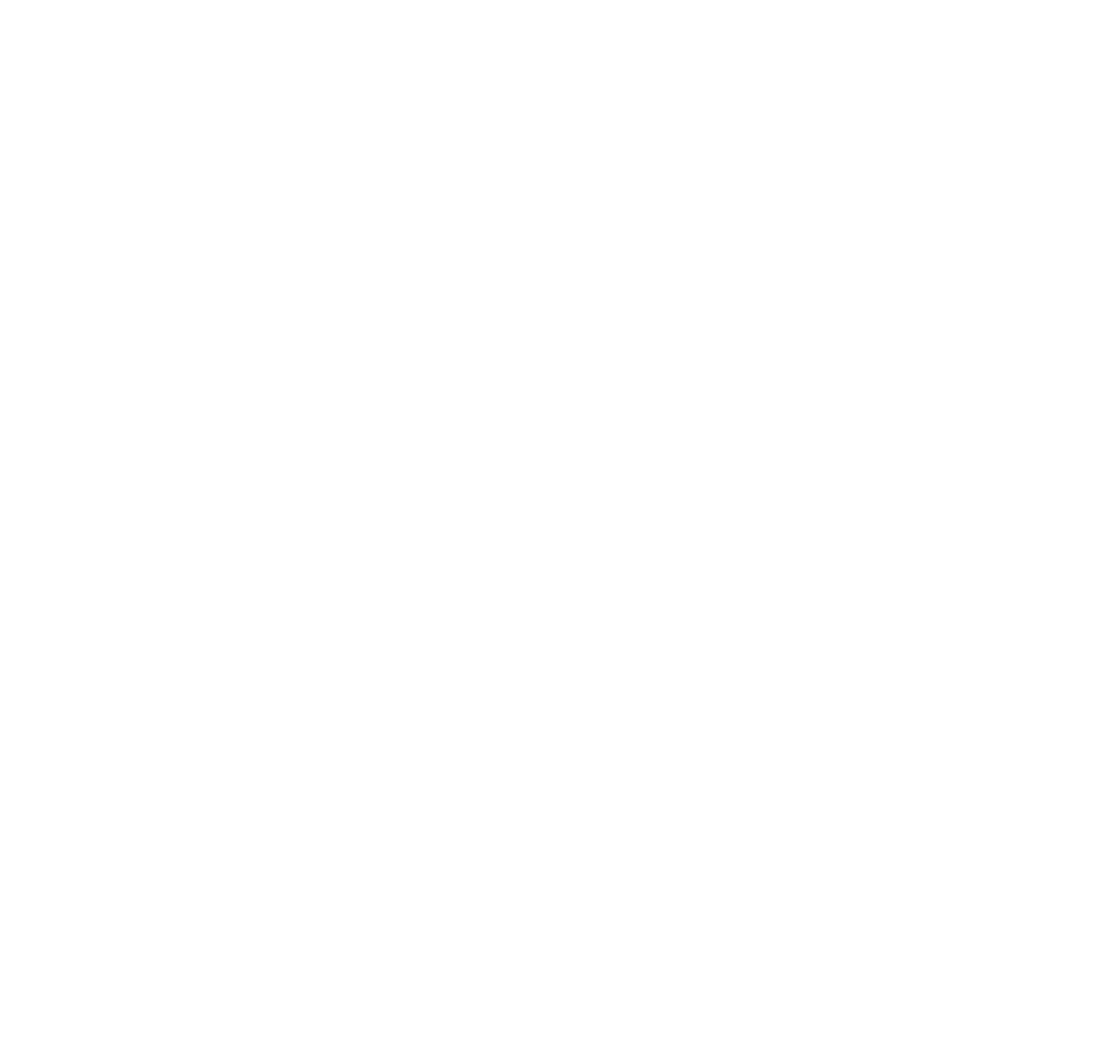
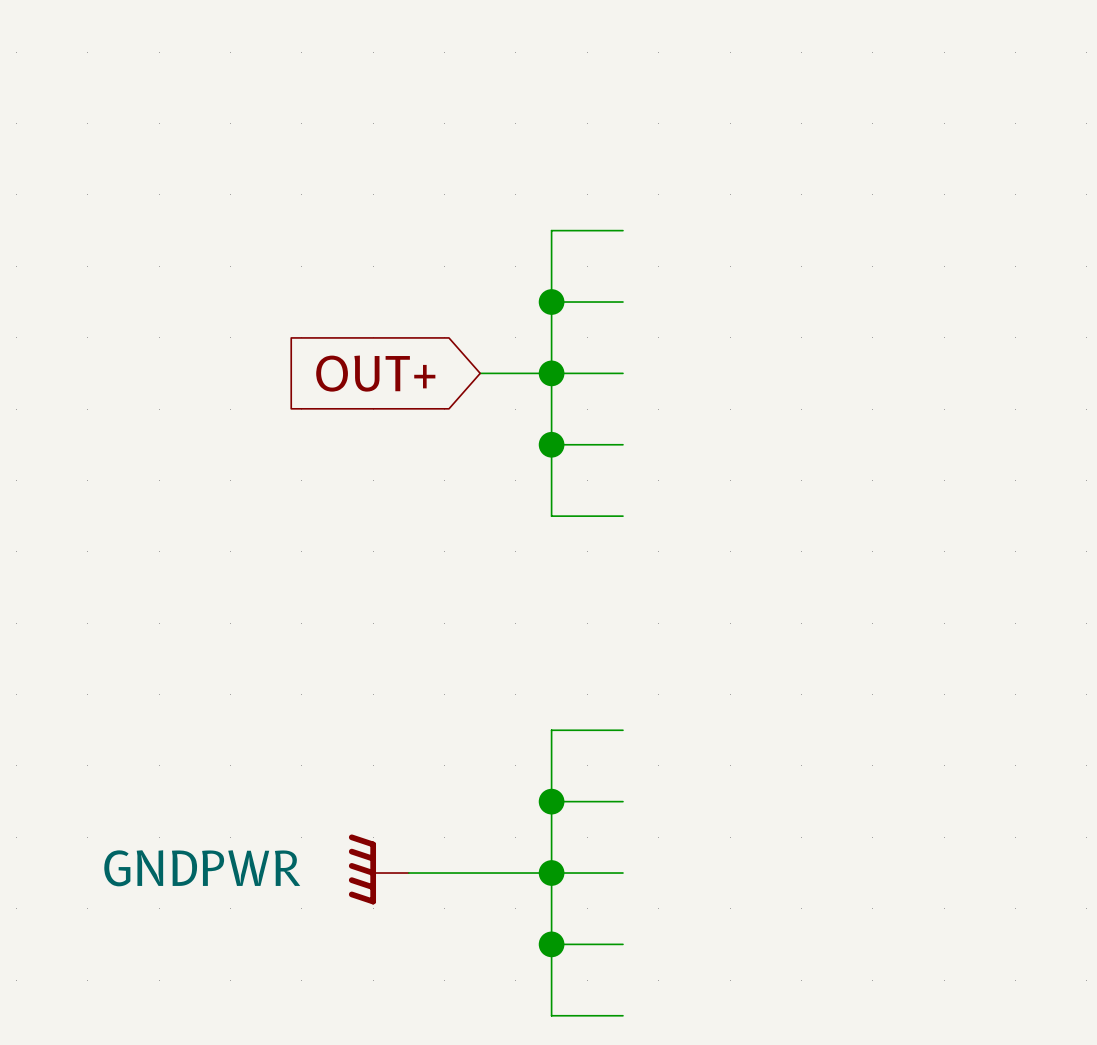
wire: none -> (622, 230) (551, 230) (551, 516) (622, 516)
wire: none -> (551, 302) (622, 302)
junction: none -> (551, 302)
global label: none -> OUT+ (375, 373)
wire: none -> (480, 373) (622, 373)
junction: none -> (551, 373)
wire: none -> (551, 444) (622, 444)
junction: none -> (551, 444)
wire: none -> (622, 730) (551, 730) (551, 1015) (622, 1015)
wire: none -> (551, 801) (622, 801)
junction: none -> (551, 801)
power symbol: none -> GNDPWR (378, 869)
wire: none -> (408, 873) (622, 873)
junction: none -> (551, 873)
wire: none -> (551, 944) (622, 944)
junction: none -> (551, 944)

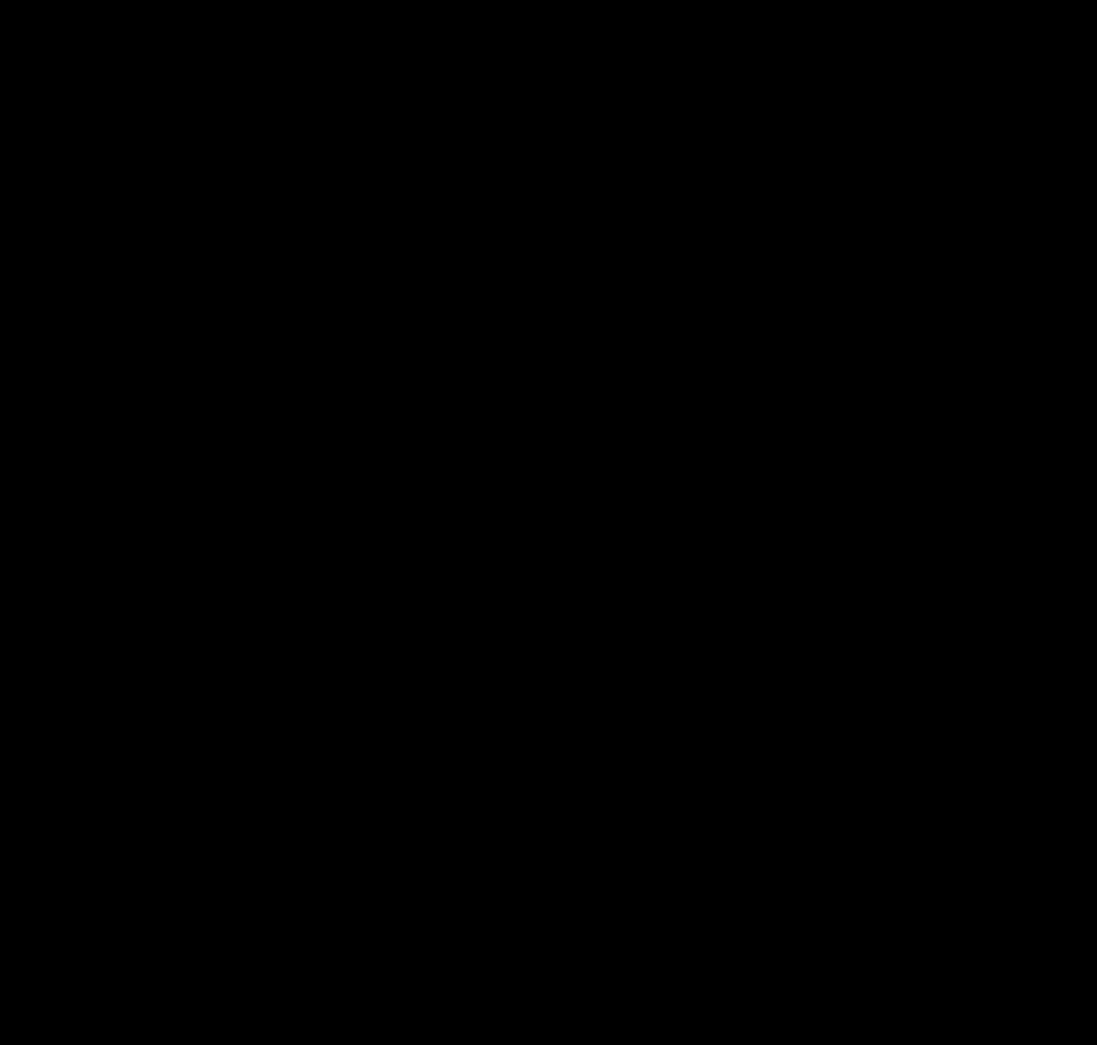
wire: (622, 230) (551, 230) (551, 516) (622, 516) -> none
wire: (551, 302) (622, 302) -> none
junction: (551, 302) -> none
global label: OUT+ (375, 373) -> none
wire: (480, 373) (622, 373) -> none
junction: (551, 373) -> none
wire: (551, 444) (622, 444) -> none
junction: (551, 444) -> none
wire: (622, 730) (551, 730) (551, 1015) (622, 1015) -> none
wire: (551, 801) (622, 801) -> none
junction: (551, 801) -> none
power symbol: GNDPWR (378, 869) -> none
wire: (408, 873) (622, 873) -> none
junction: (551, 873) -> none
wire: (551, 944) (622, 944) -> none
junction: (551, 944) -> none

